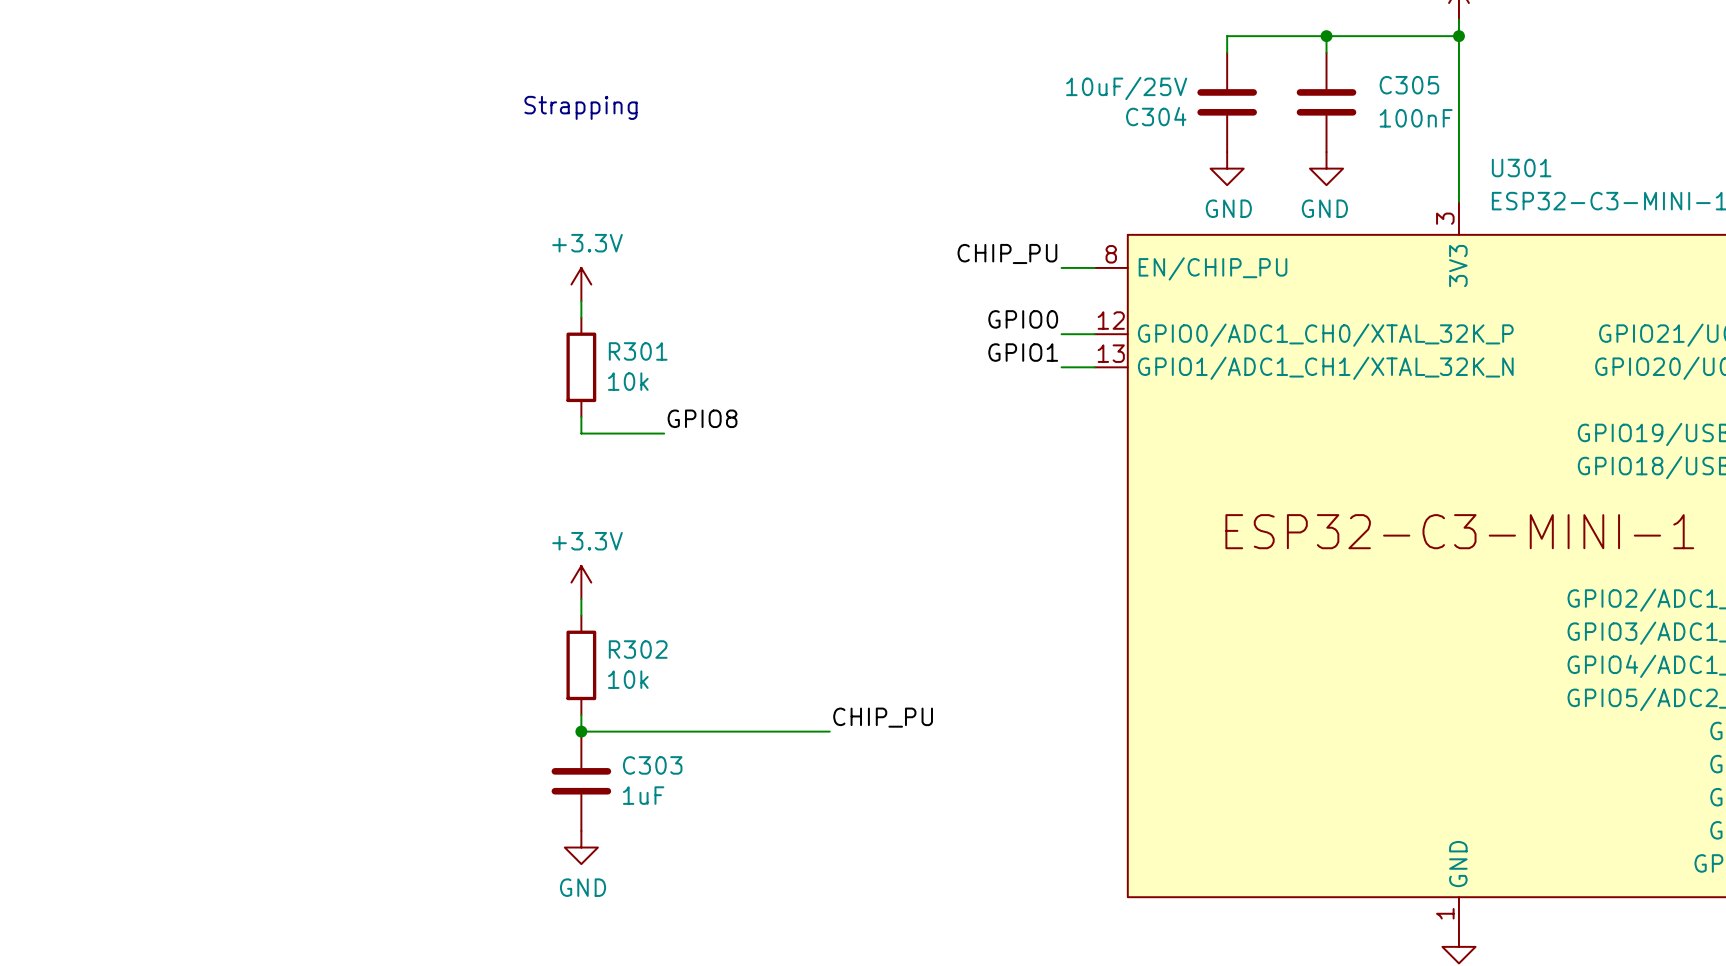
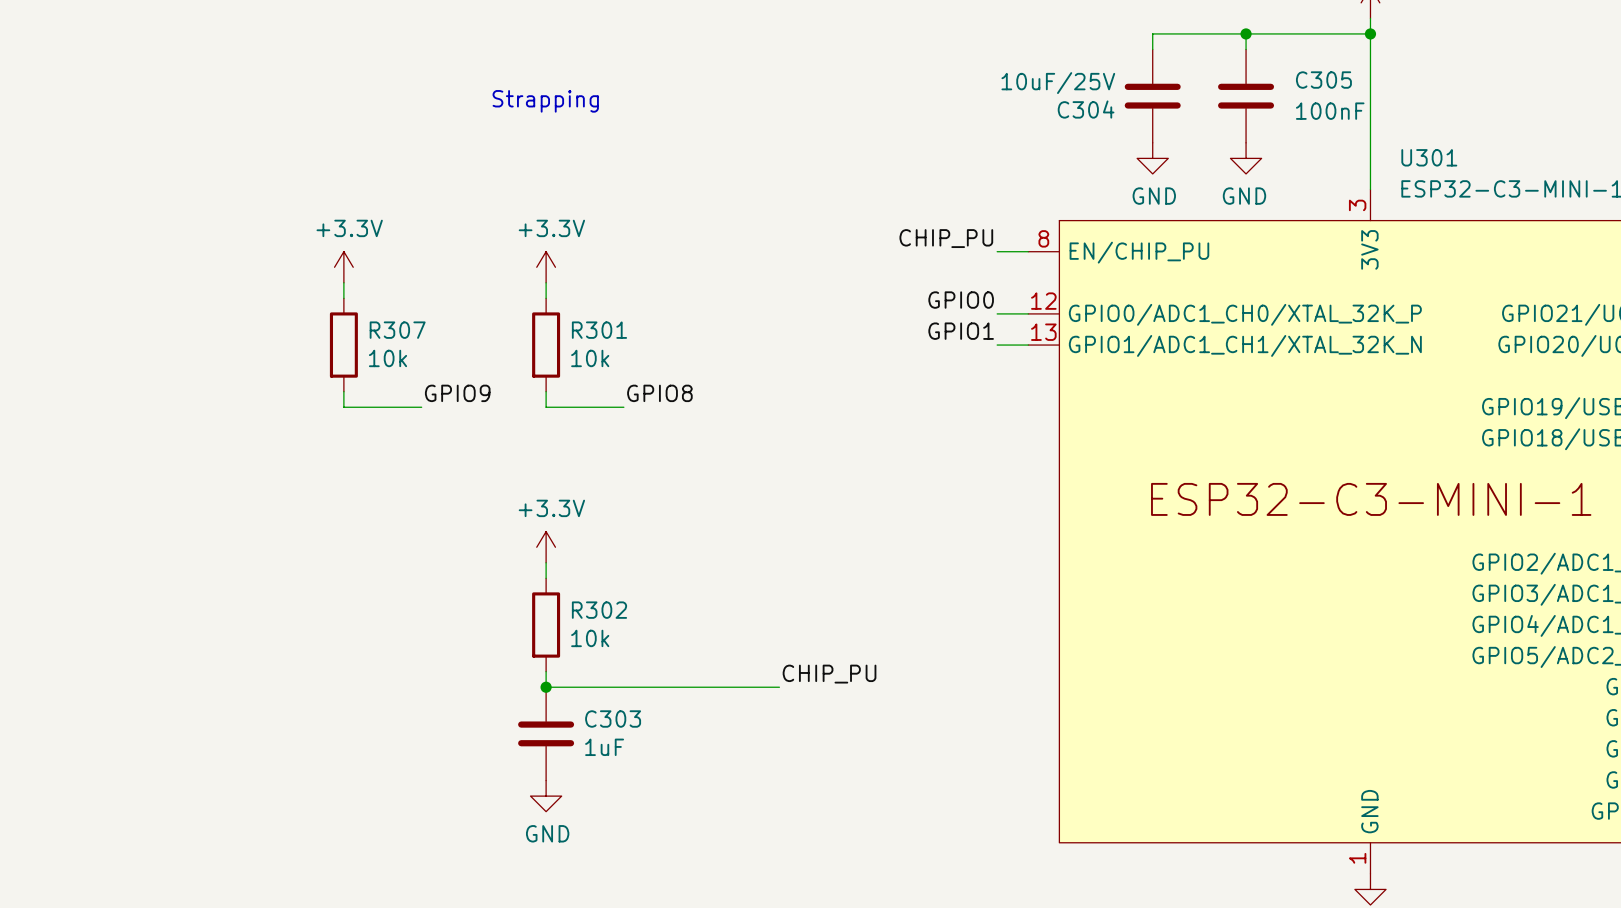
power symbol: none -> +3.3V (343, 267)
wire: none -> (343, 282) (343, 298)
R307: none -> 10k (343, 345)
wire: none -> (343, 391) (343, 407) (421, 407)
label: none -> GPIO9 (457, 393)

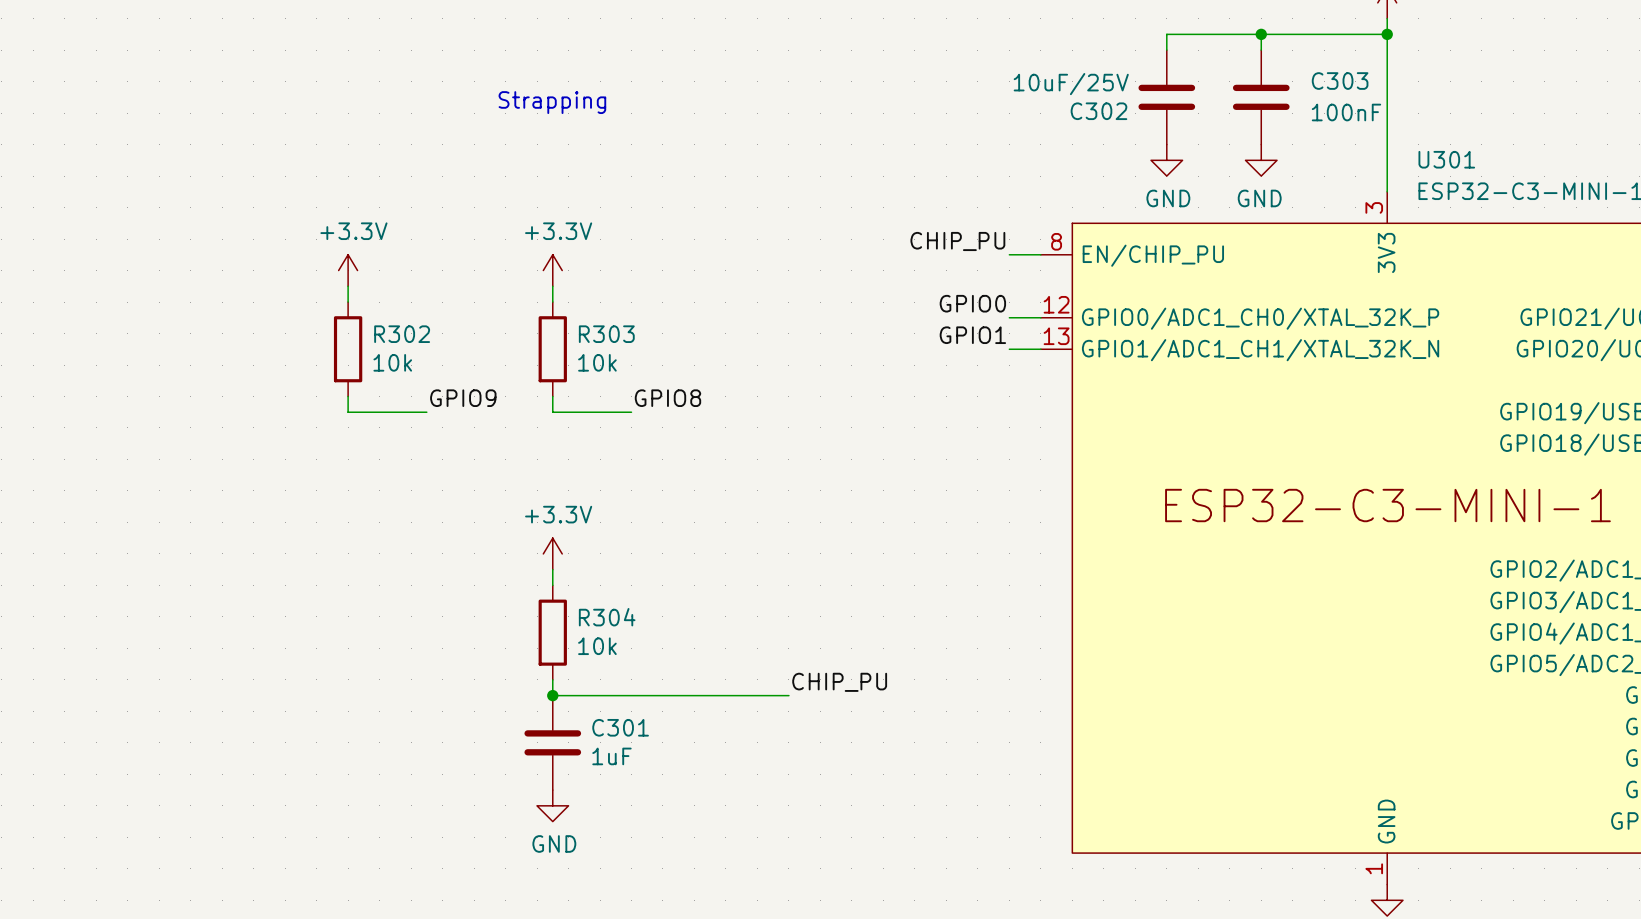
C305 name: C305 (1323, 80) -> C303 (1340, 81)
C304 name: C304 (1086, 109) -> C302 (1098, 111)
R307 name: R307 (397, 330) -> R302 (402, 334)
R301 name: R301 (599, 330) -> R303 (606, 334)
R302 name: R302 (599, 610) -> R304 (607, 617)
C303 name: C303 (613, 719) -> C301 (620, 727)

